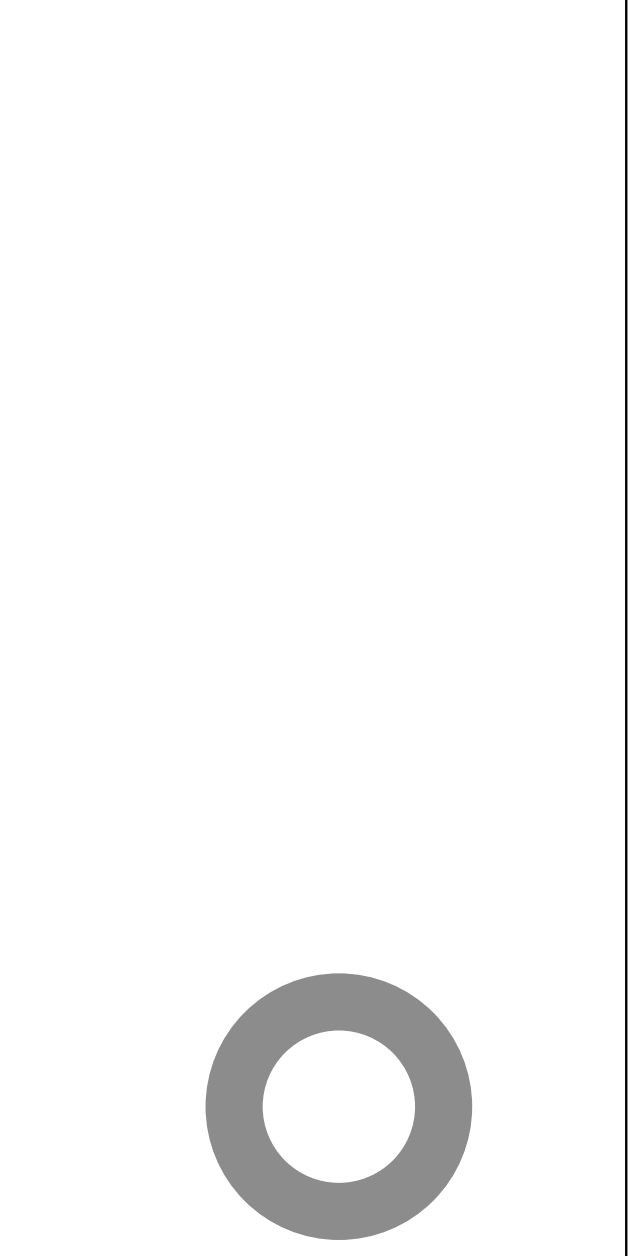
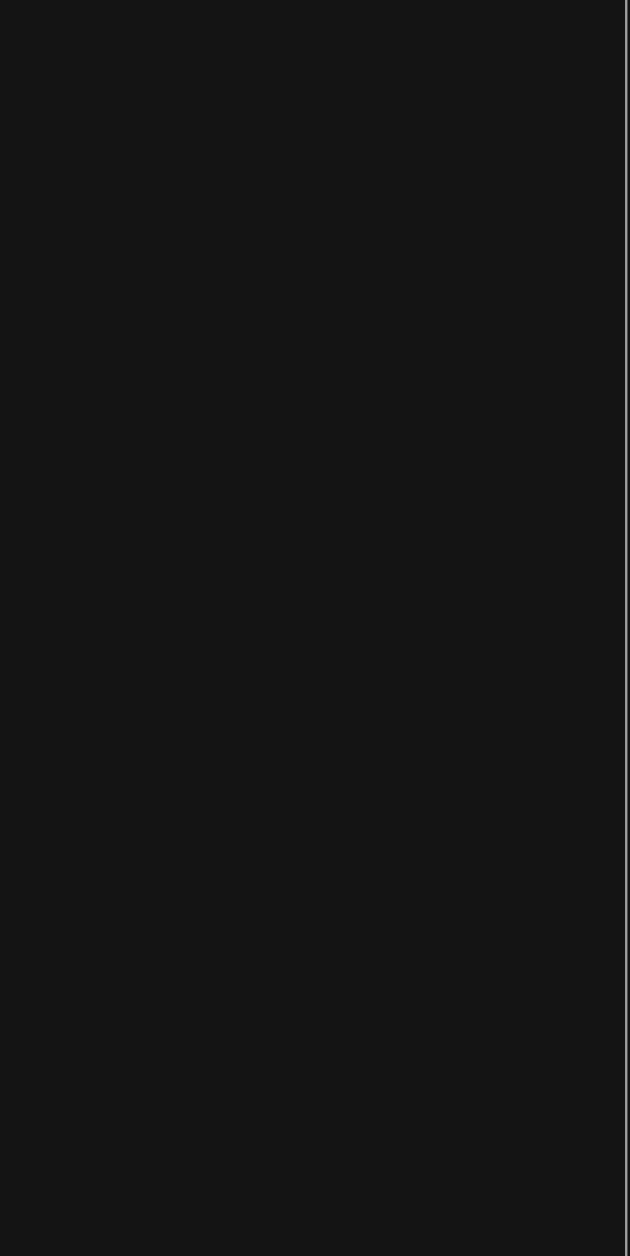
part: (338, 1106) -> none

